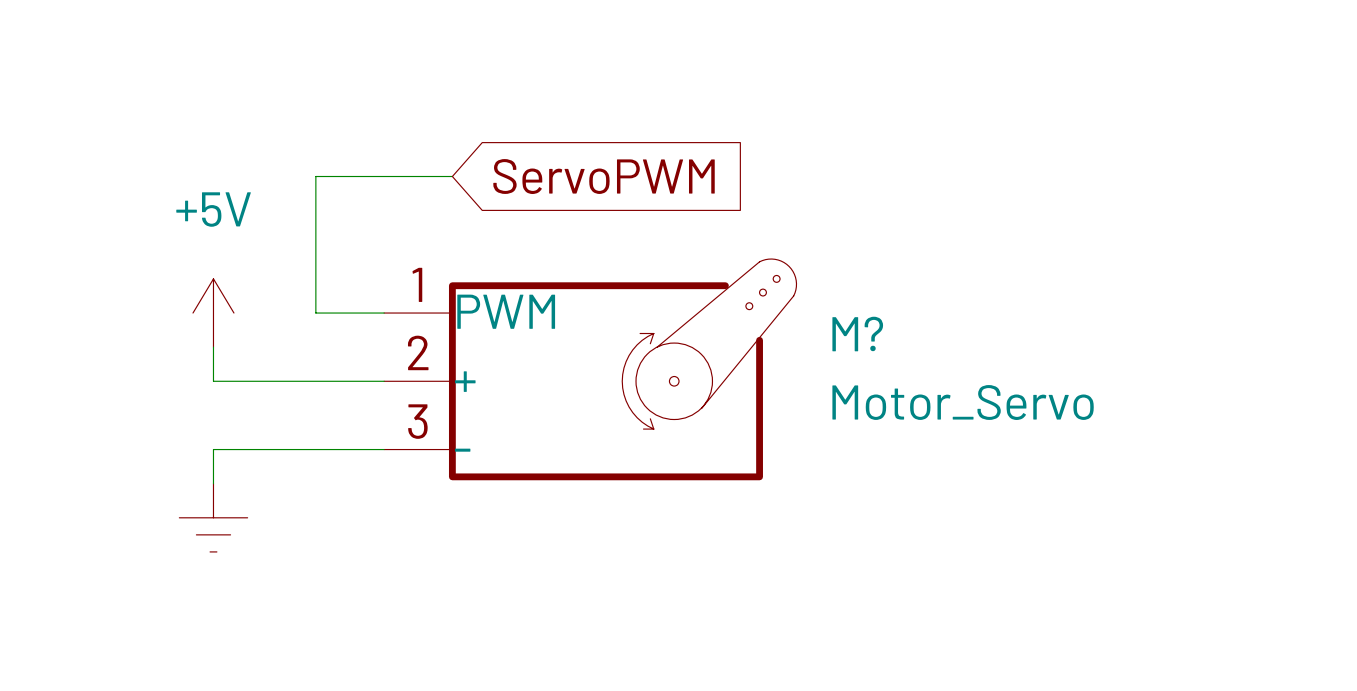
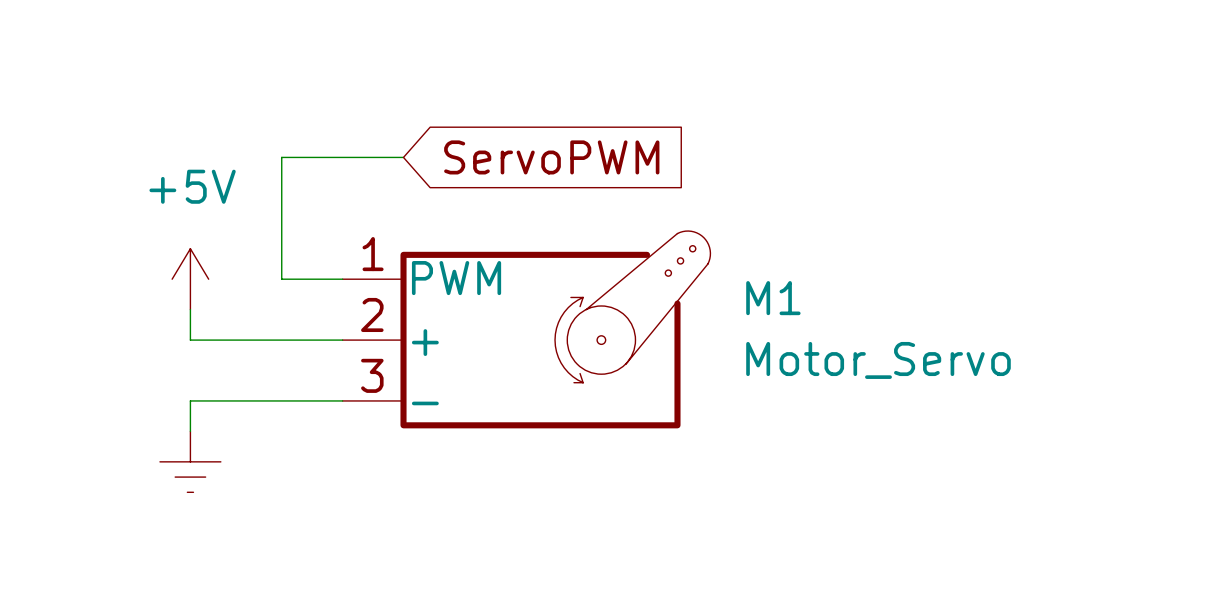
M? name: M? (857, 334) -> M1 (773, 298)

